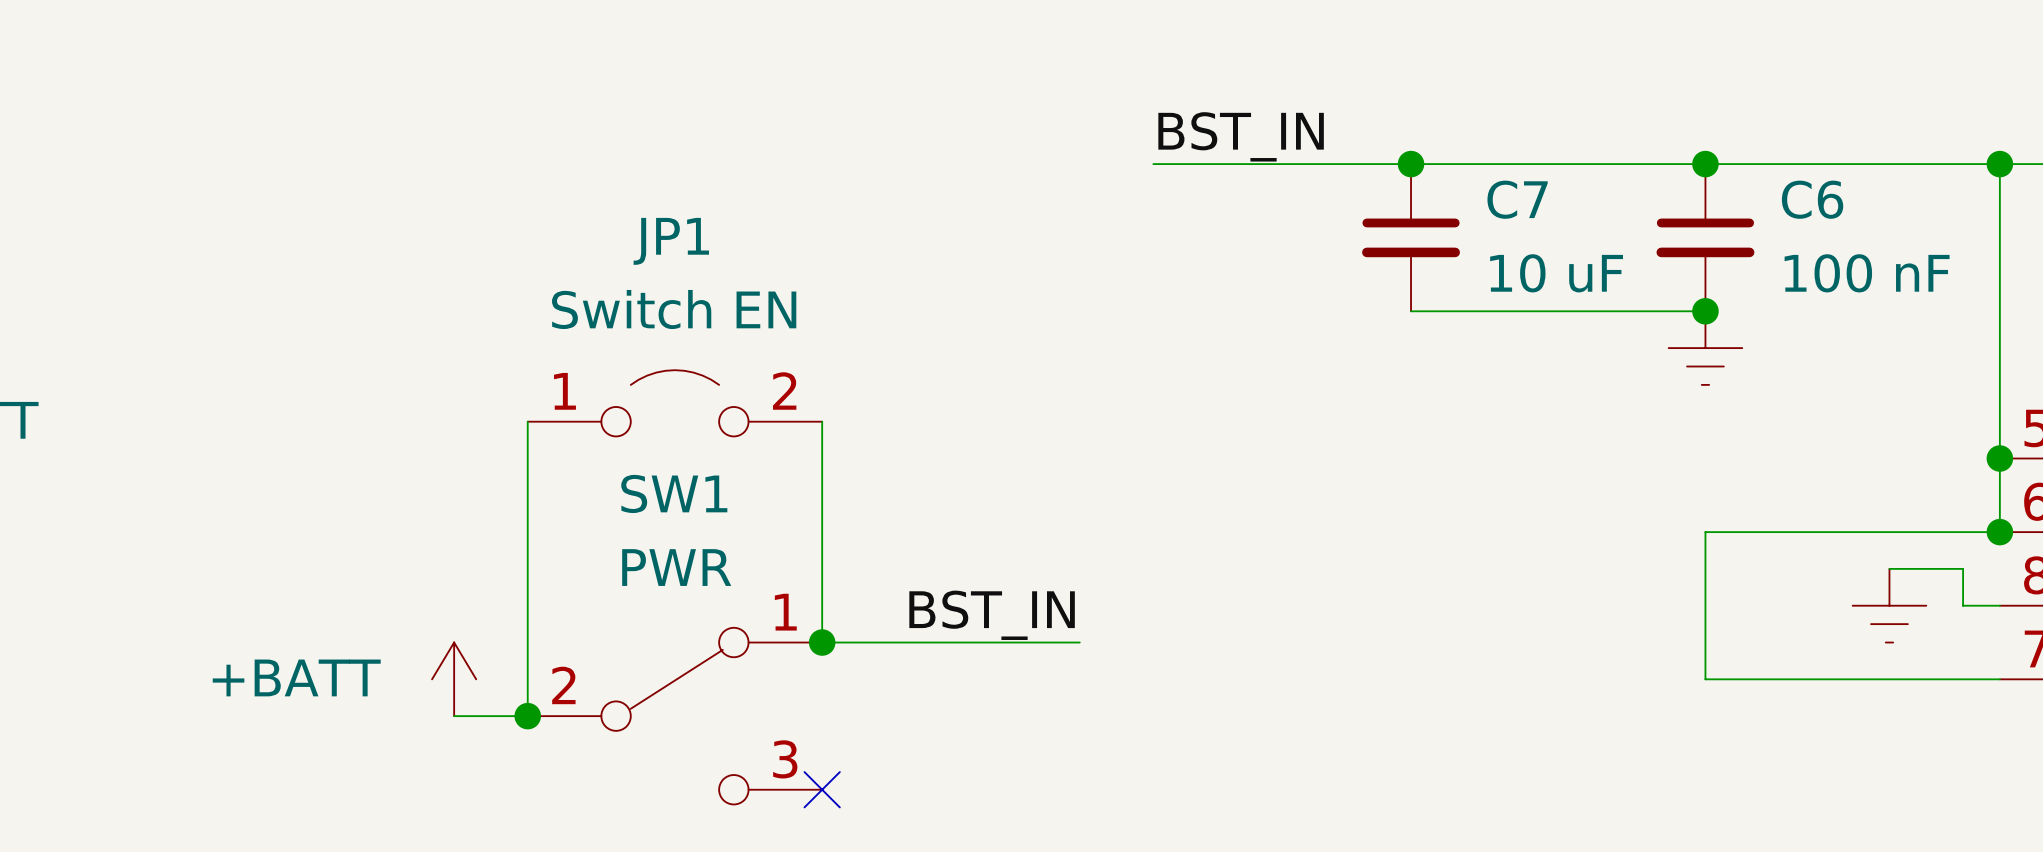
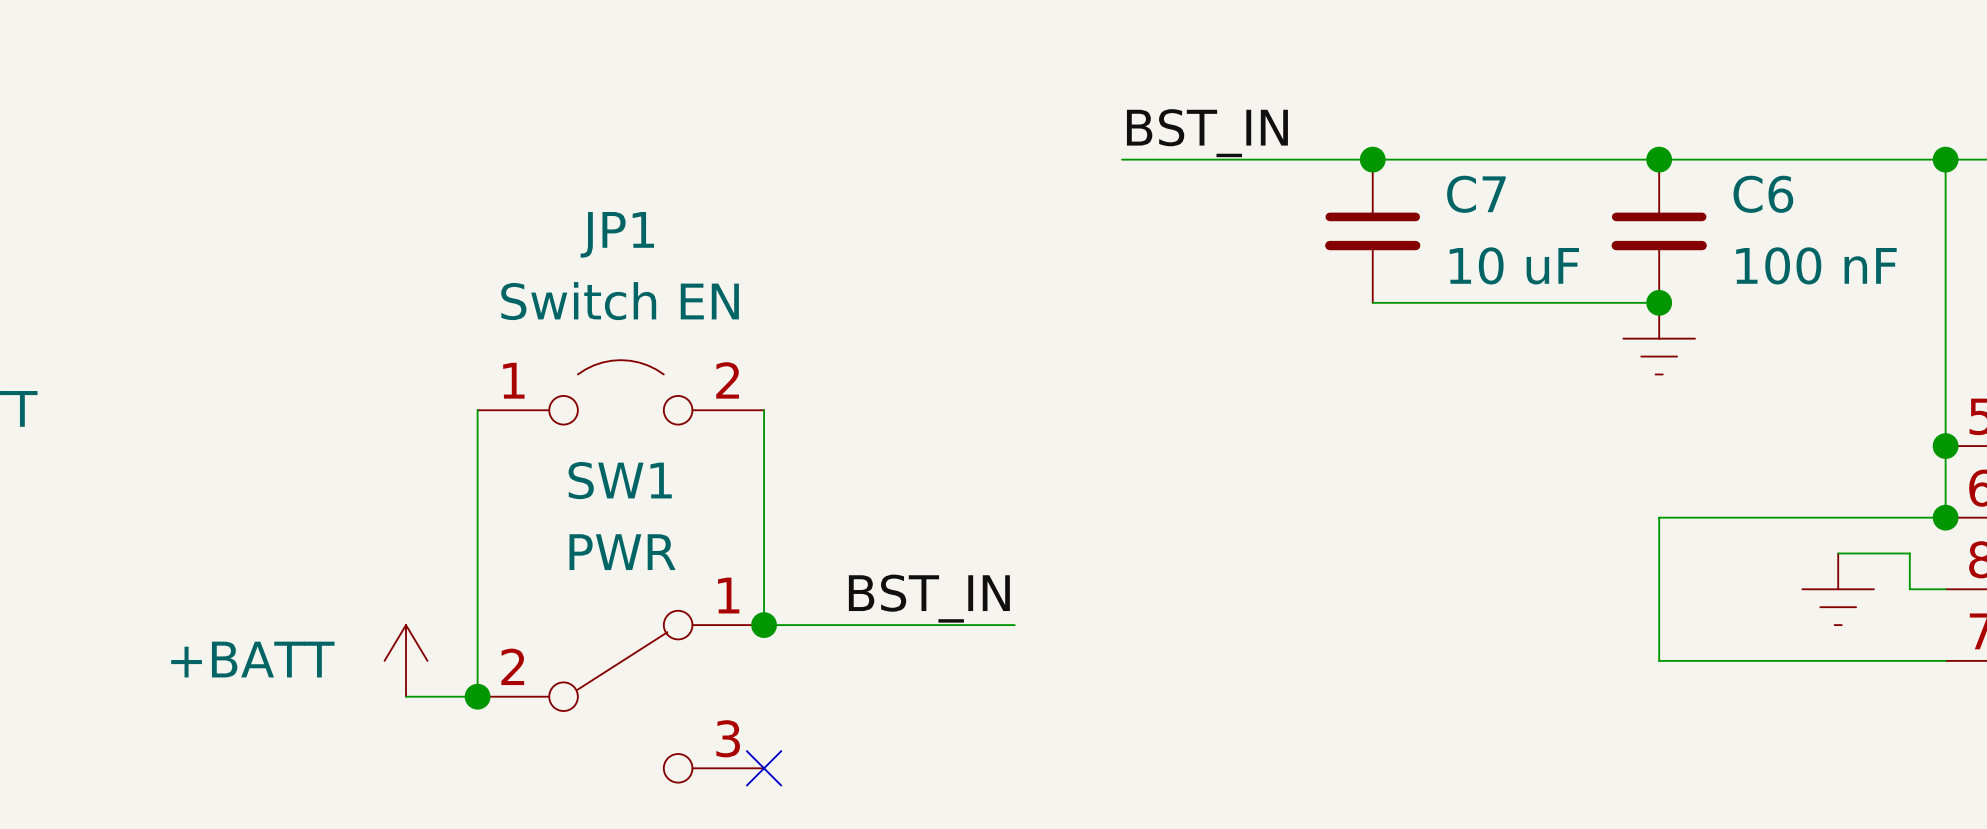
JP1 position: (674, 403) -> (620, 392)
wire: (527, 421) (527, 716) (490, 716) -> (477, 410) (477, 696)
wire: (822, 421) (822, 642) -> (764, 410) (764, 625) (799, 625)
label position: BST_IN (992, 615) -> BST_IN (929, 598)
junction position: (822, 642) -> (764, 625)
wire: (1042, 642) (1079, 642) -> (406, 696) (441, 696)
power symbol position: +BATT (454, 679) -> +BATT (406, 660)
junction position: (527, 716) -> (477, 696)
SW1 position: (674, 716) -> (620, 696)
no-connect mark position: (822, 789) -> (764, 768)

